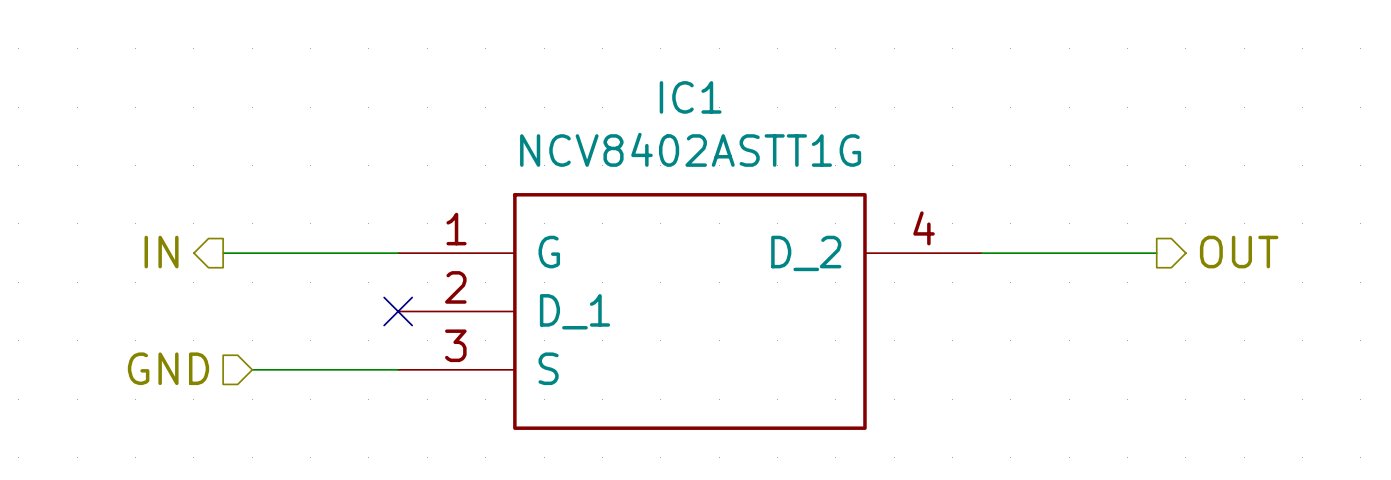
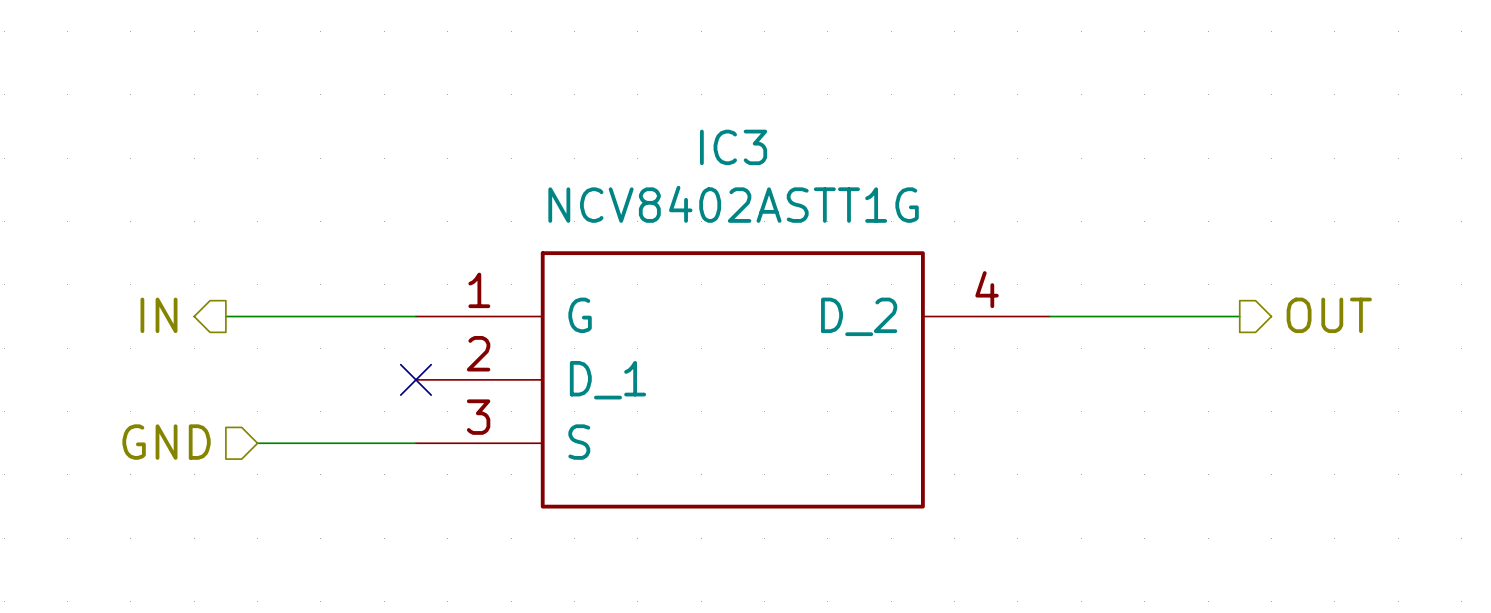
IC1 name: IC1 (690, 97) -> IC3 (733, 147)

